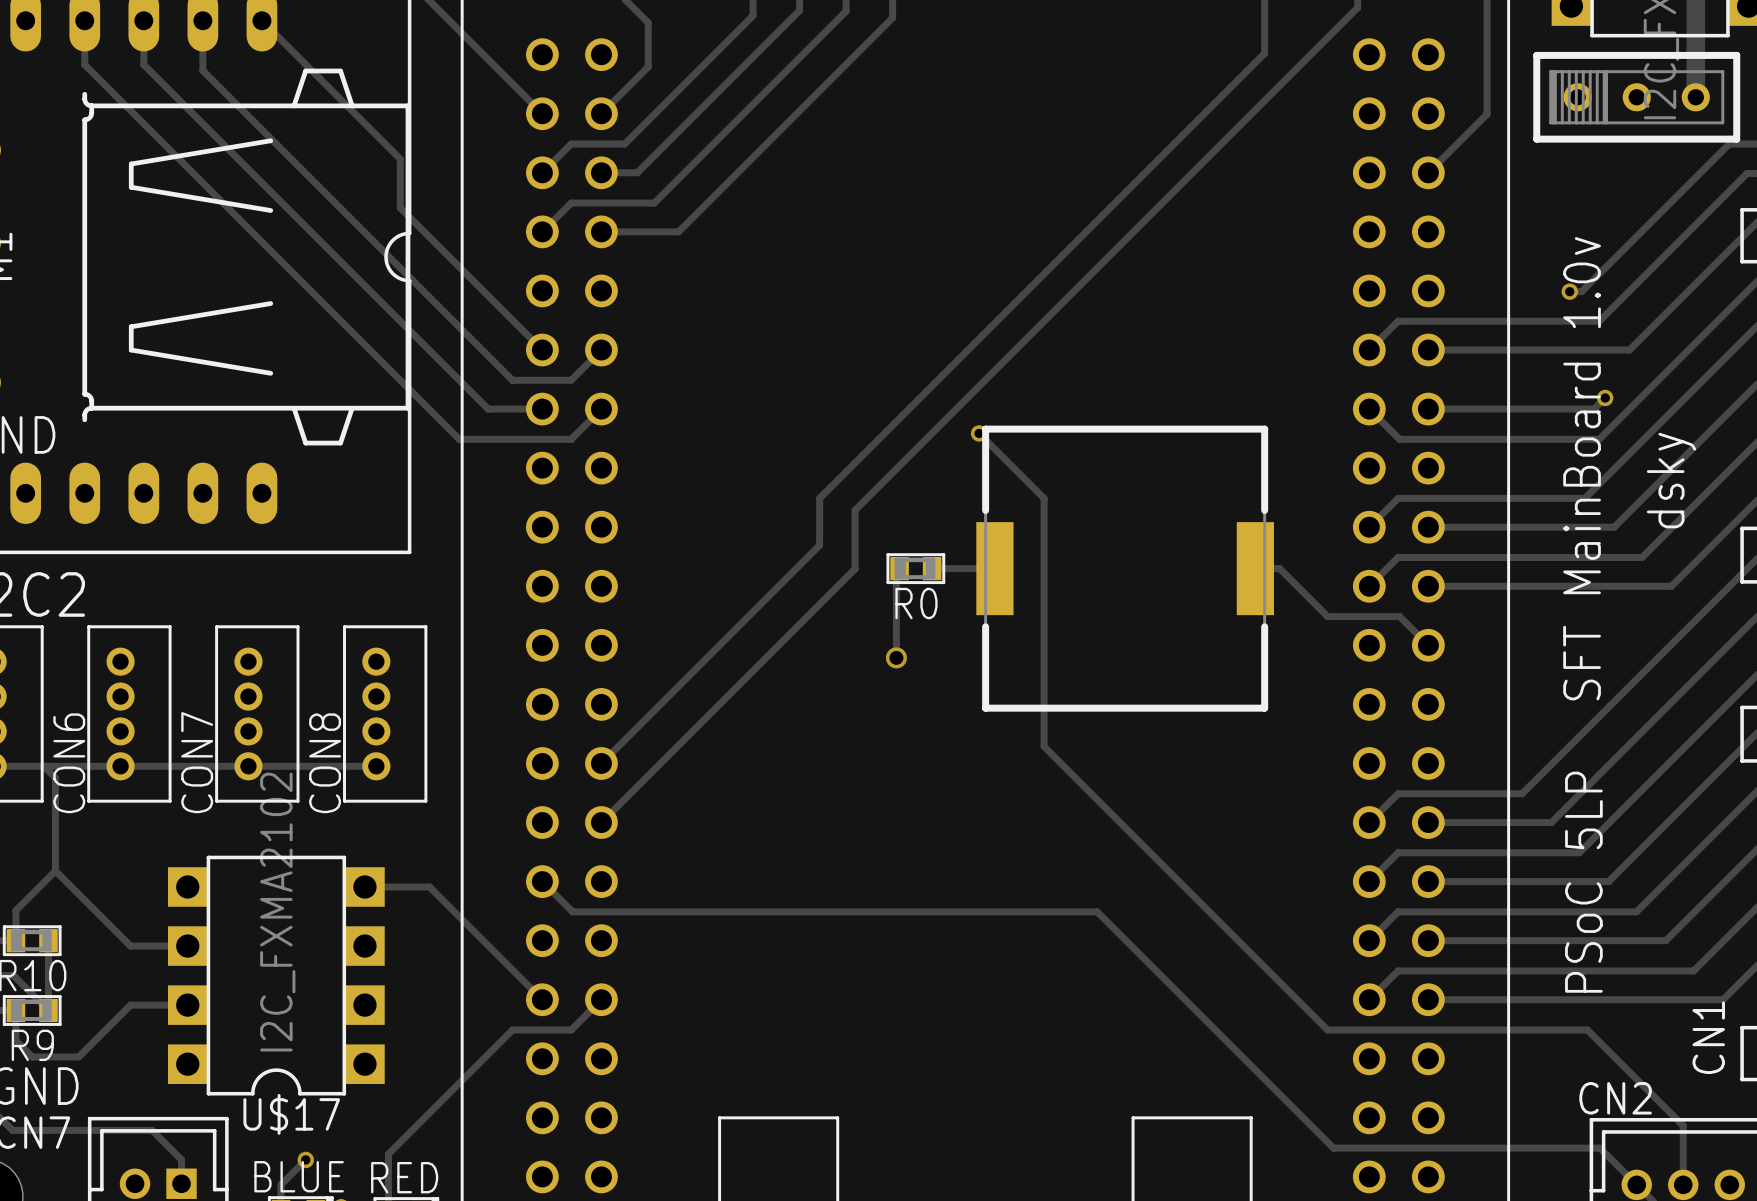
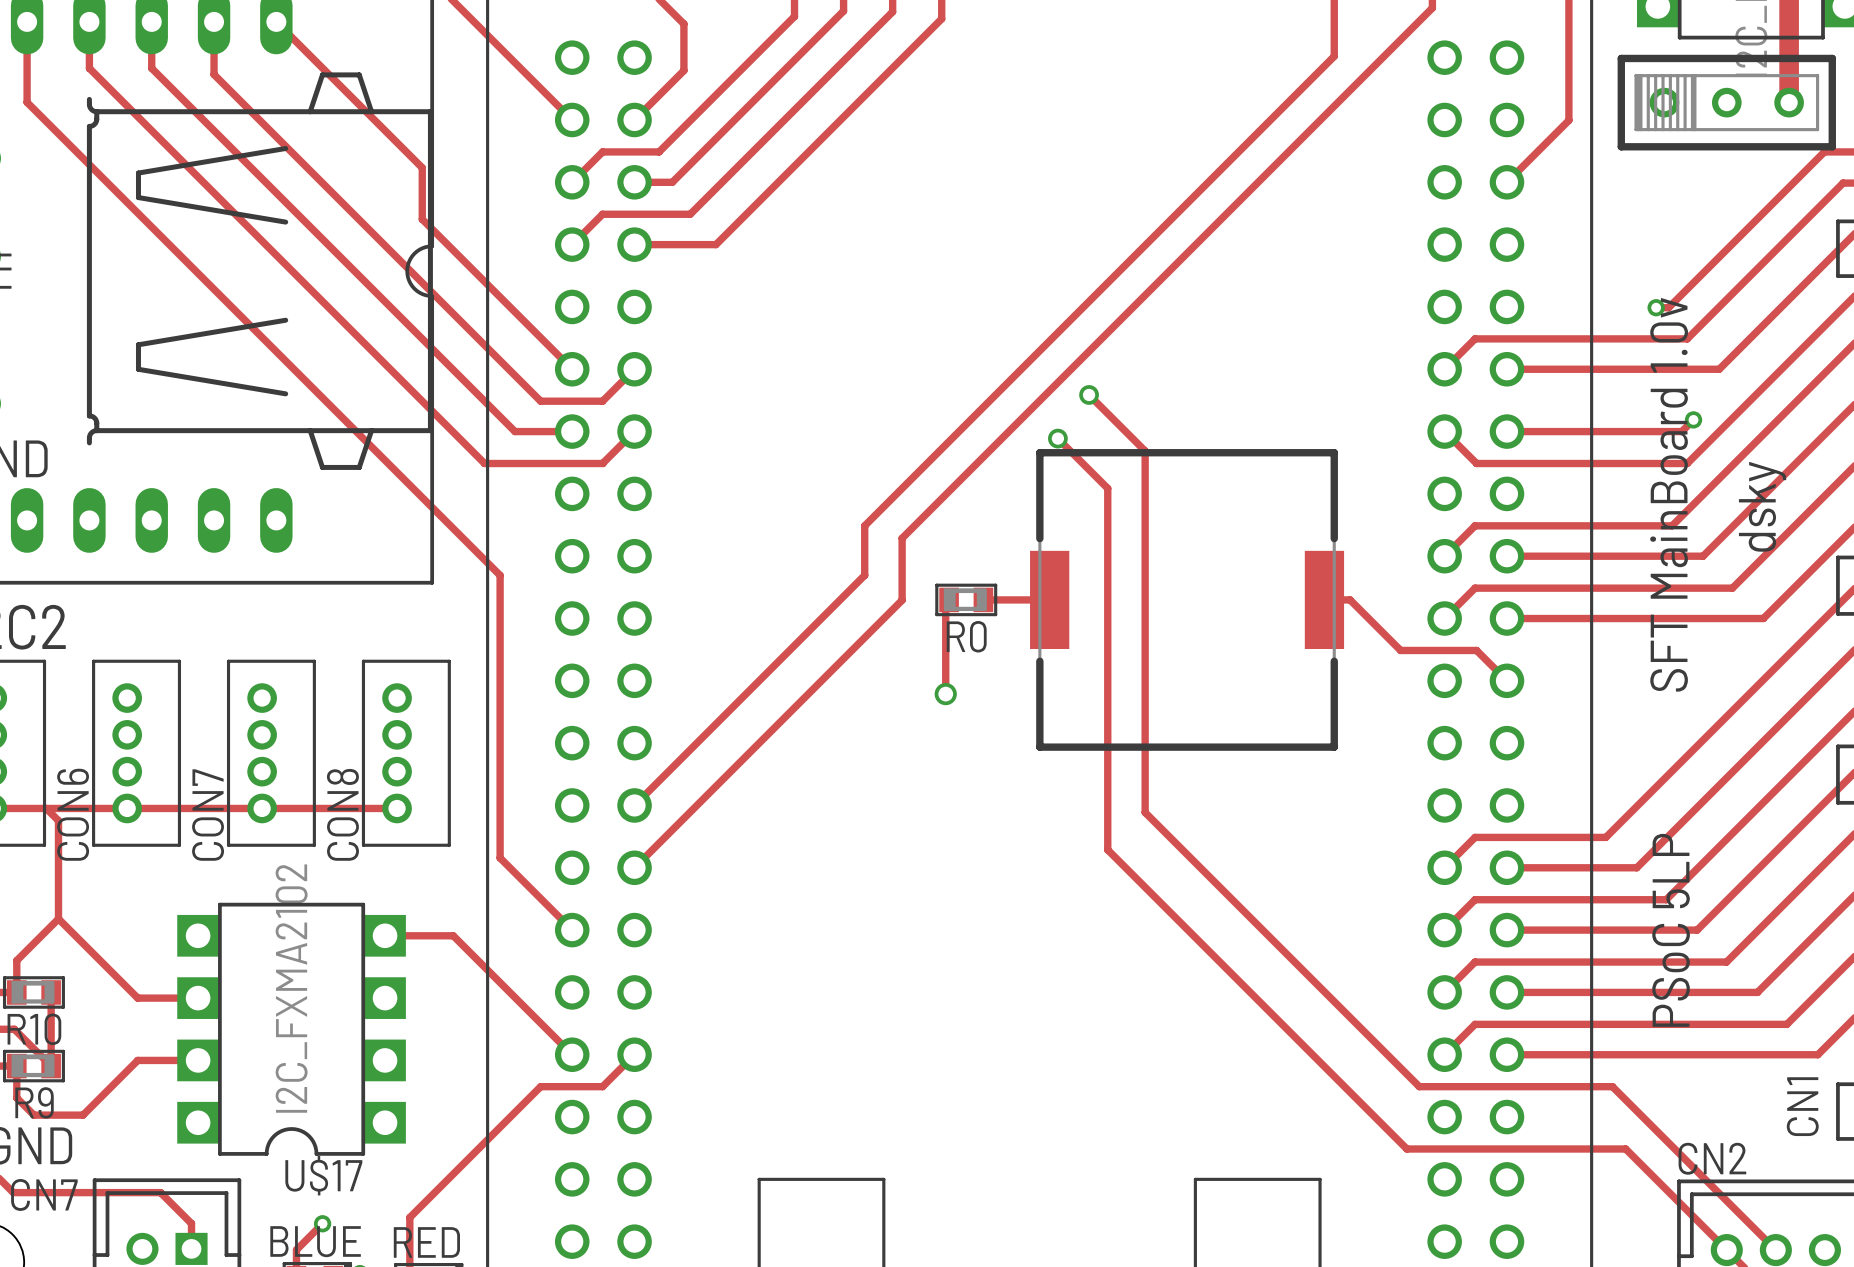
track: none -> (27, 21) (27, 102) (500, 575) (500, 857) (572, 930)
via: none -> (1089, 394)
via: none -> (1057, 438)
track: (979, 433) (1044, 498) (1044, 746) (1327, 1030) (1345, 1030) -> (1089, 394) (1145, 451) (1145, 812) (1419, 1086)
via: (979, 433) -> none
track: (542, 881) (572, 911) (1097, 911) (1333, 1148) (1600, 1148) -> (1057, 438) (1107, 488) (1107, 849) (1406, 1148) (1625, 1148) (1688, 1211)
track: (1528, 1030) (1587, 1030) (1683, 1125) (1683, 1184) -> (1612, 1086) (1775, 1250)

